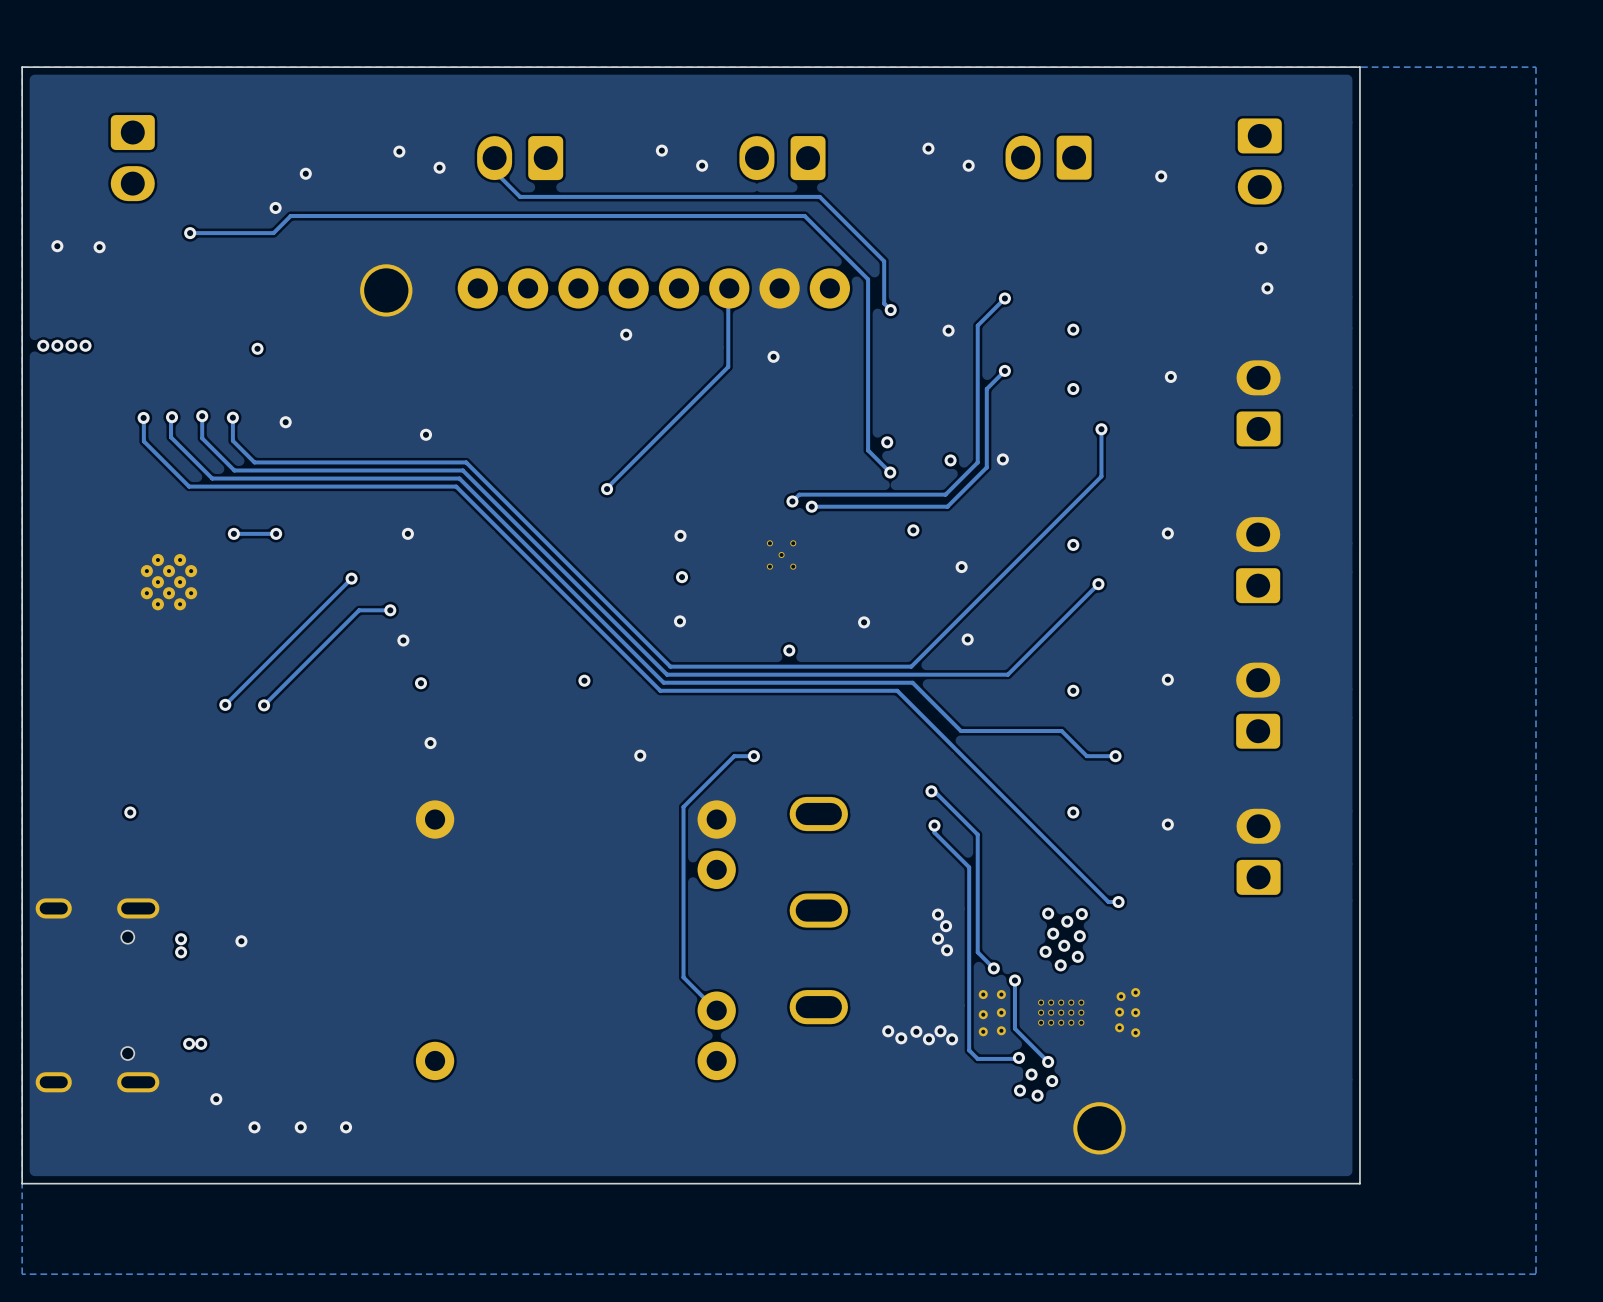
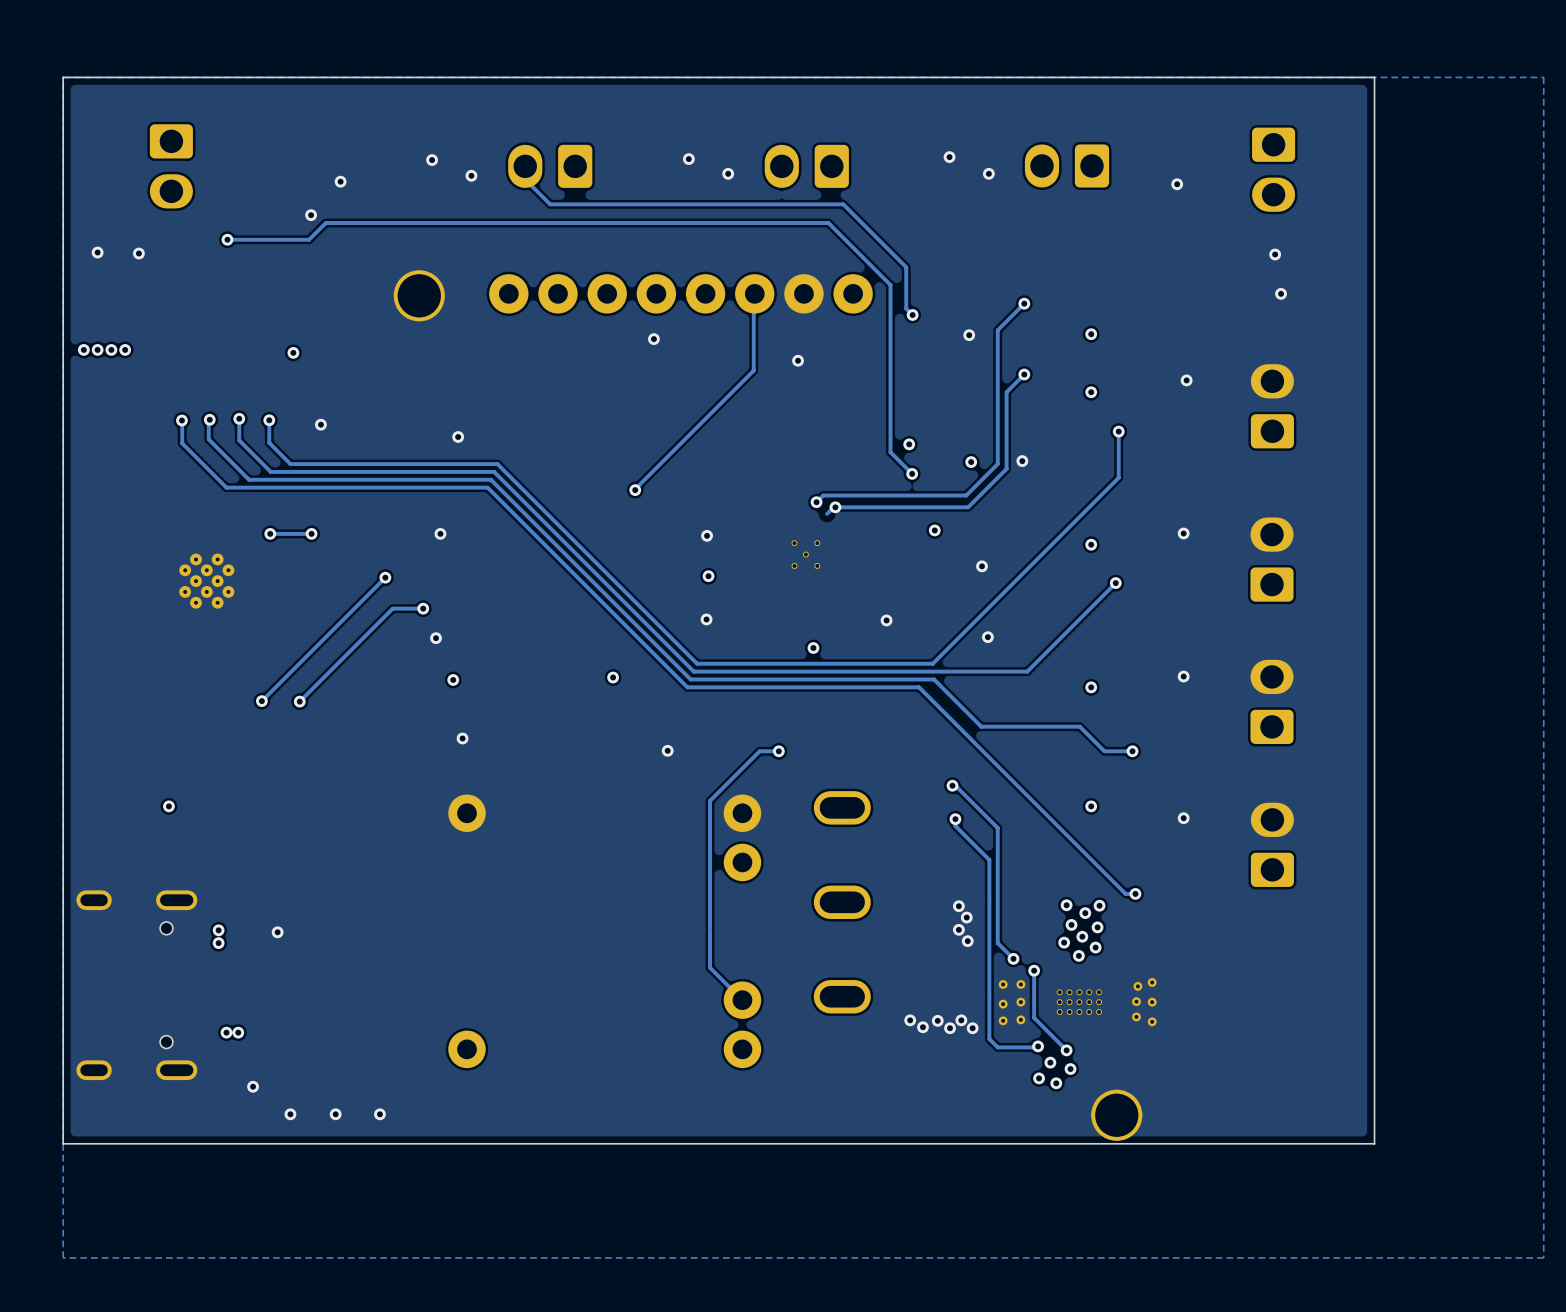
board edge: (1359, 67) (1359, 1183) (22, 1183) (22, 1157) -> (1371, 77) (1374, 77) (1374, 1143) (63, 1143)
track: none -> (835, 507) (827, 513)

